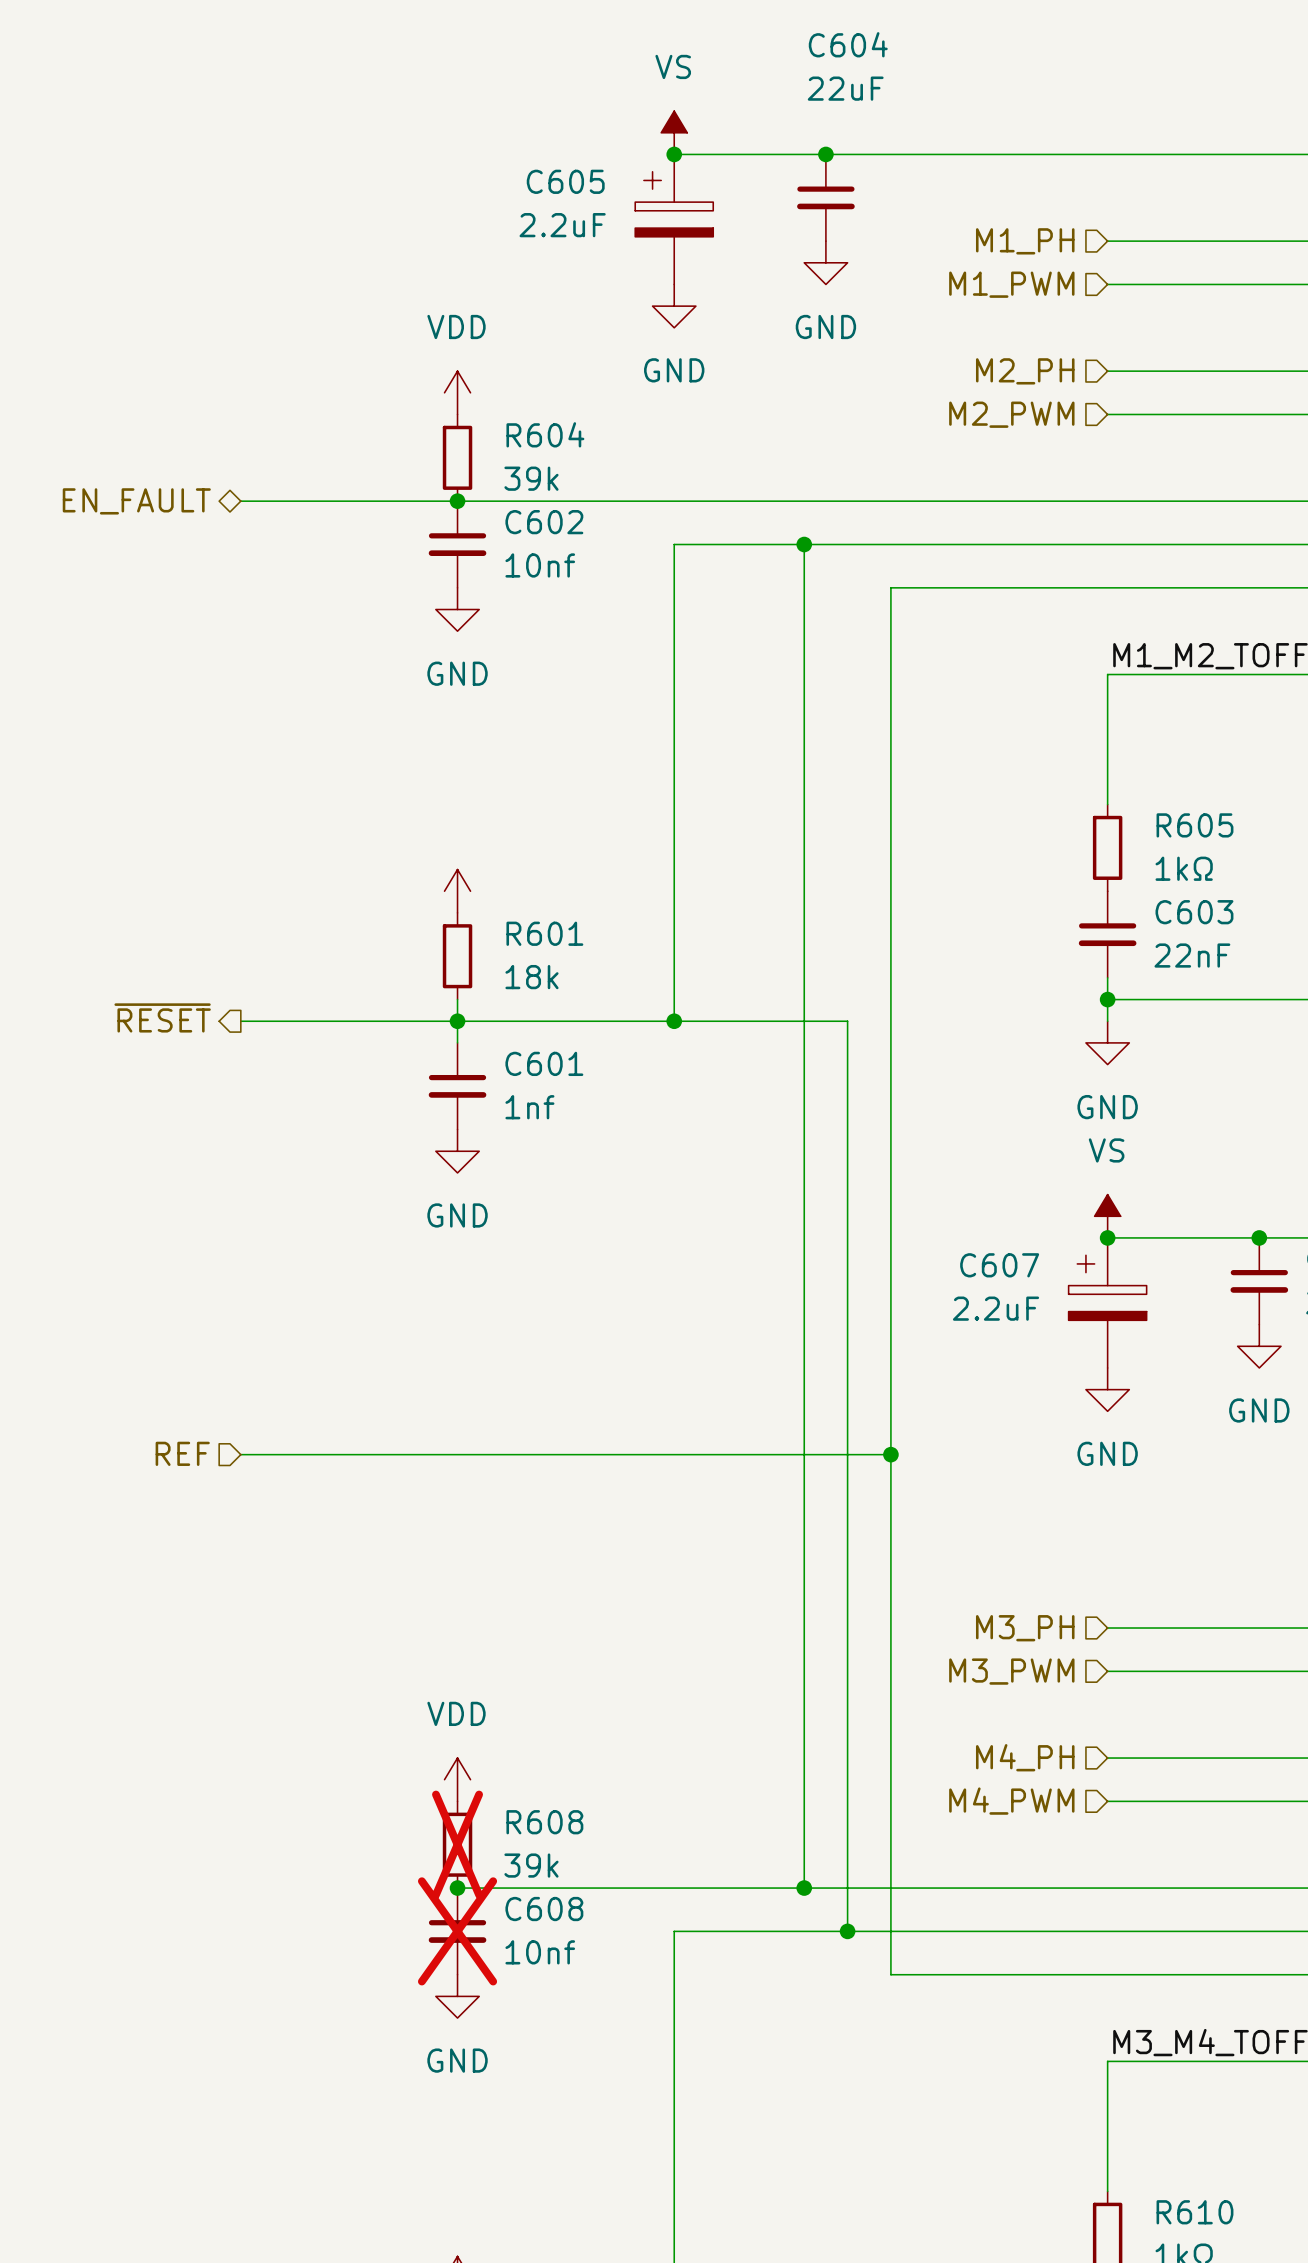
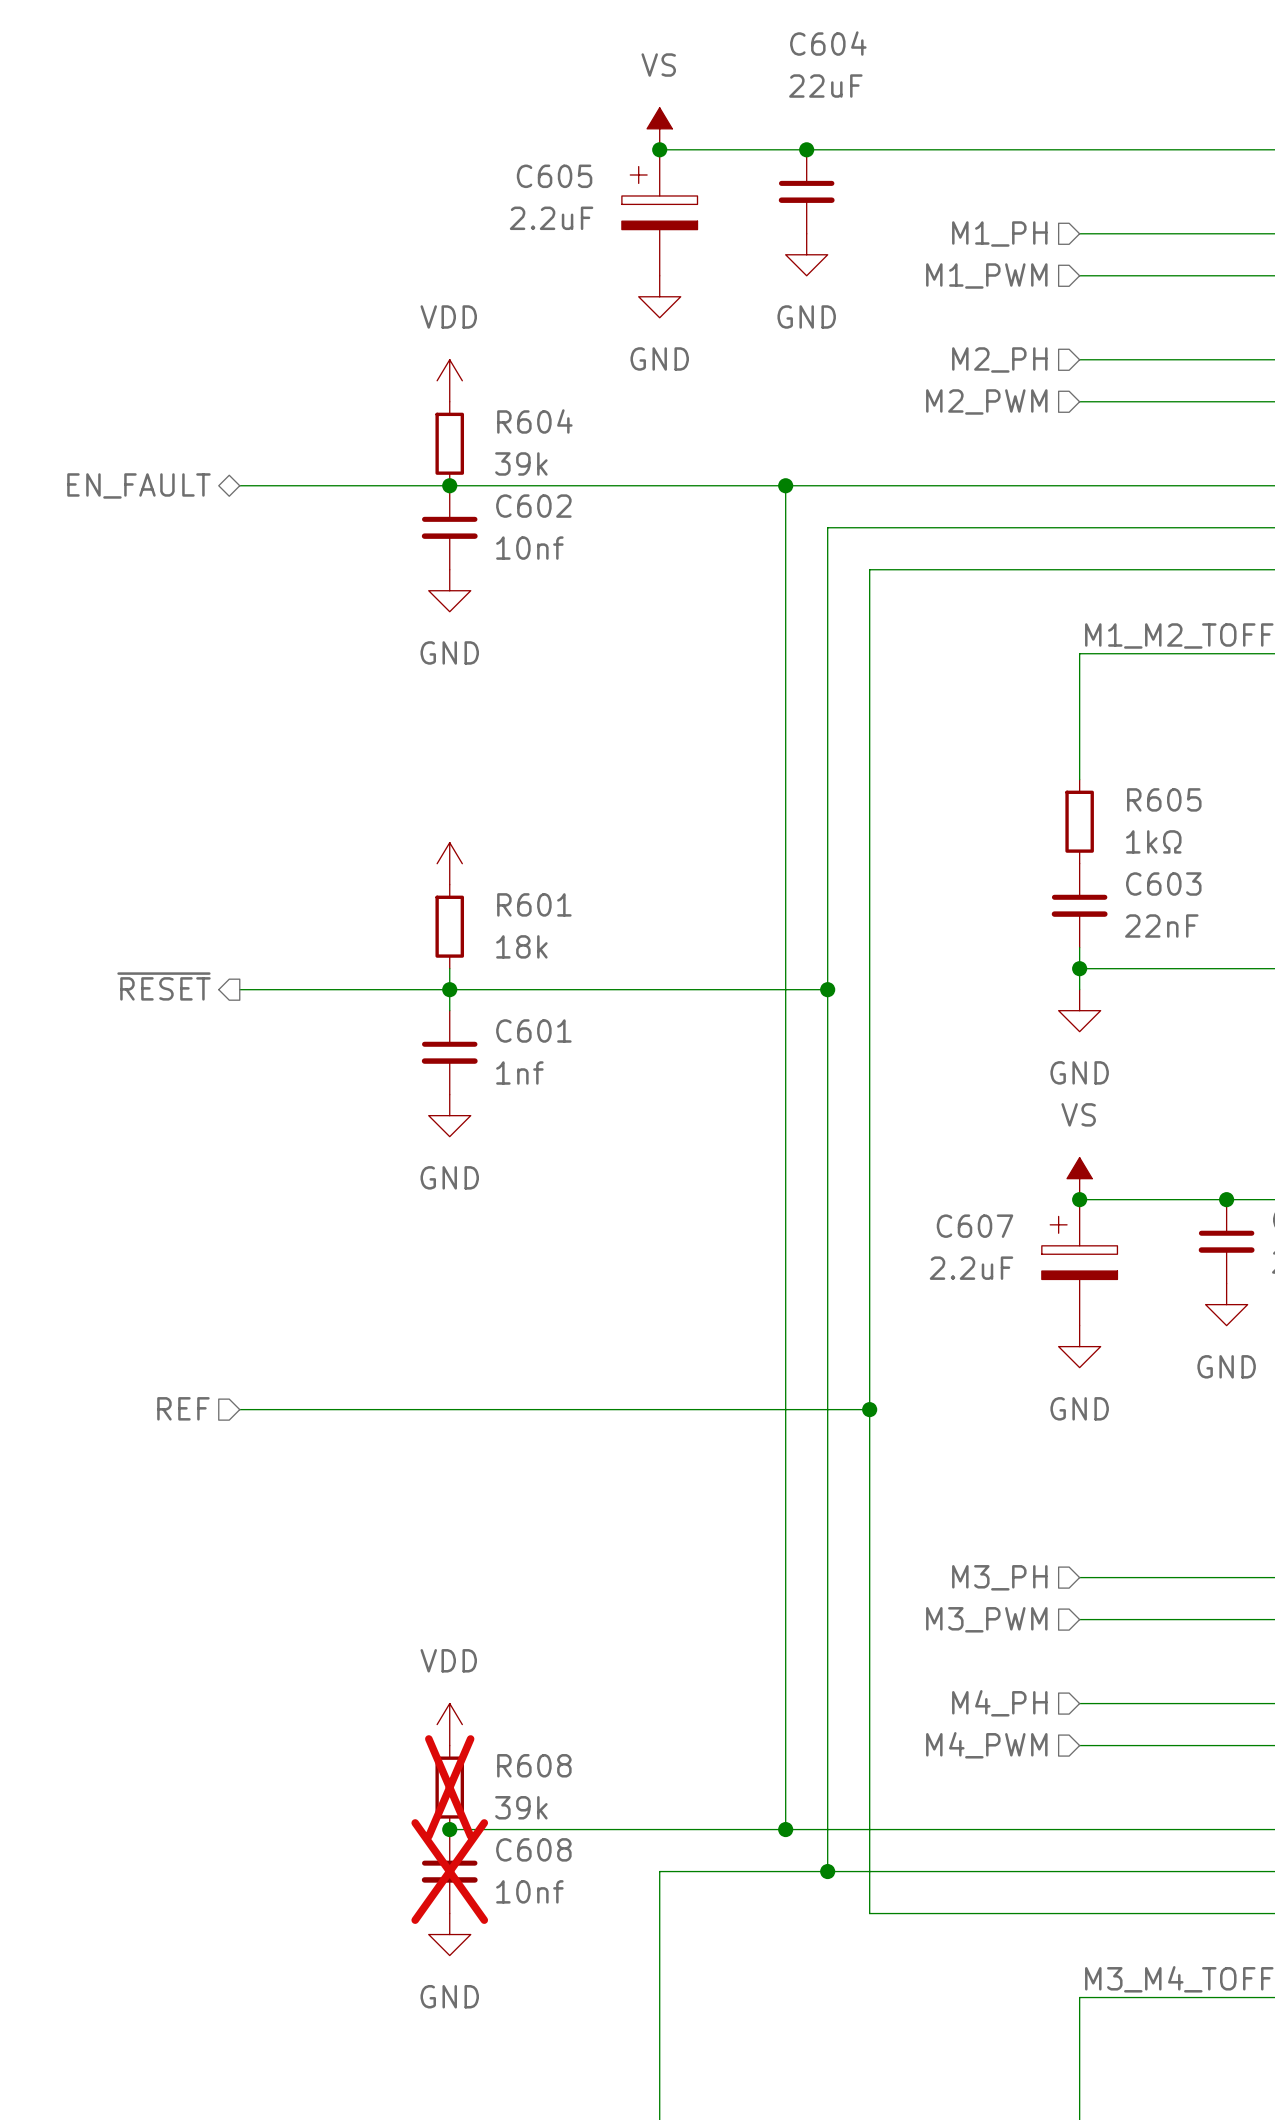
wire: none -> (785, 485) (785, 527)
junction position: (804, 544) -> (785, 485)
wire: (847, 544) (674, 544) (674, 1021) -> (827, 527) (827, 989)
junction: (674, 1021) -> none
junction: none -> (827, 989)

